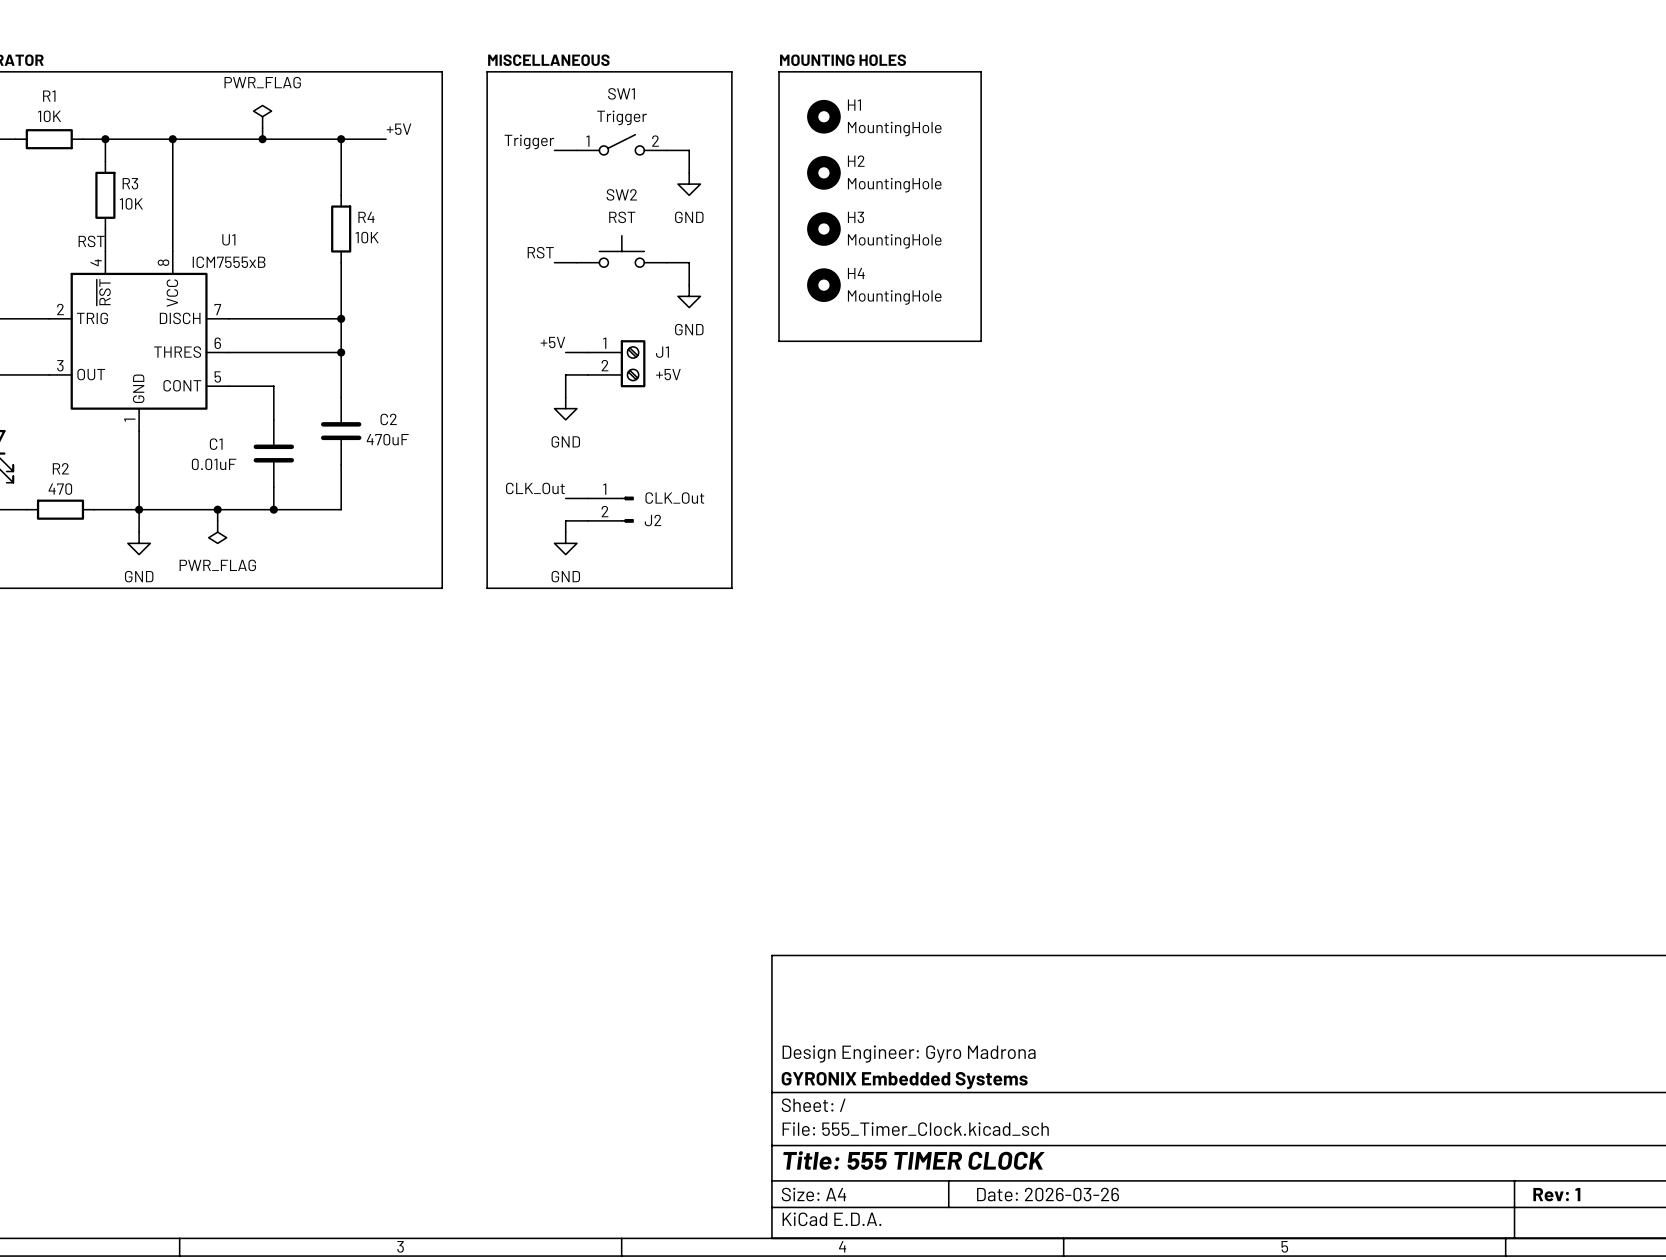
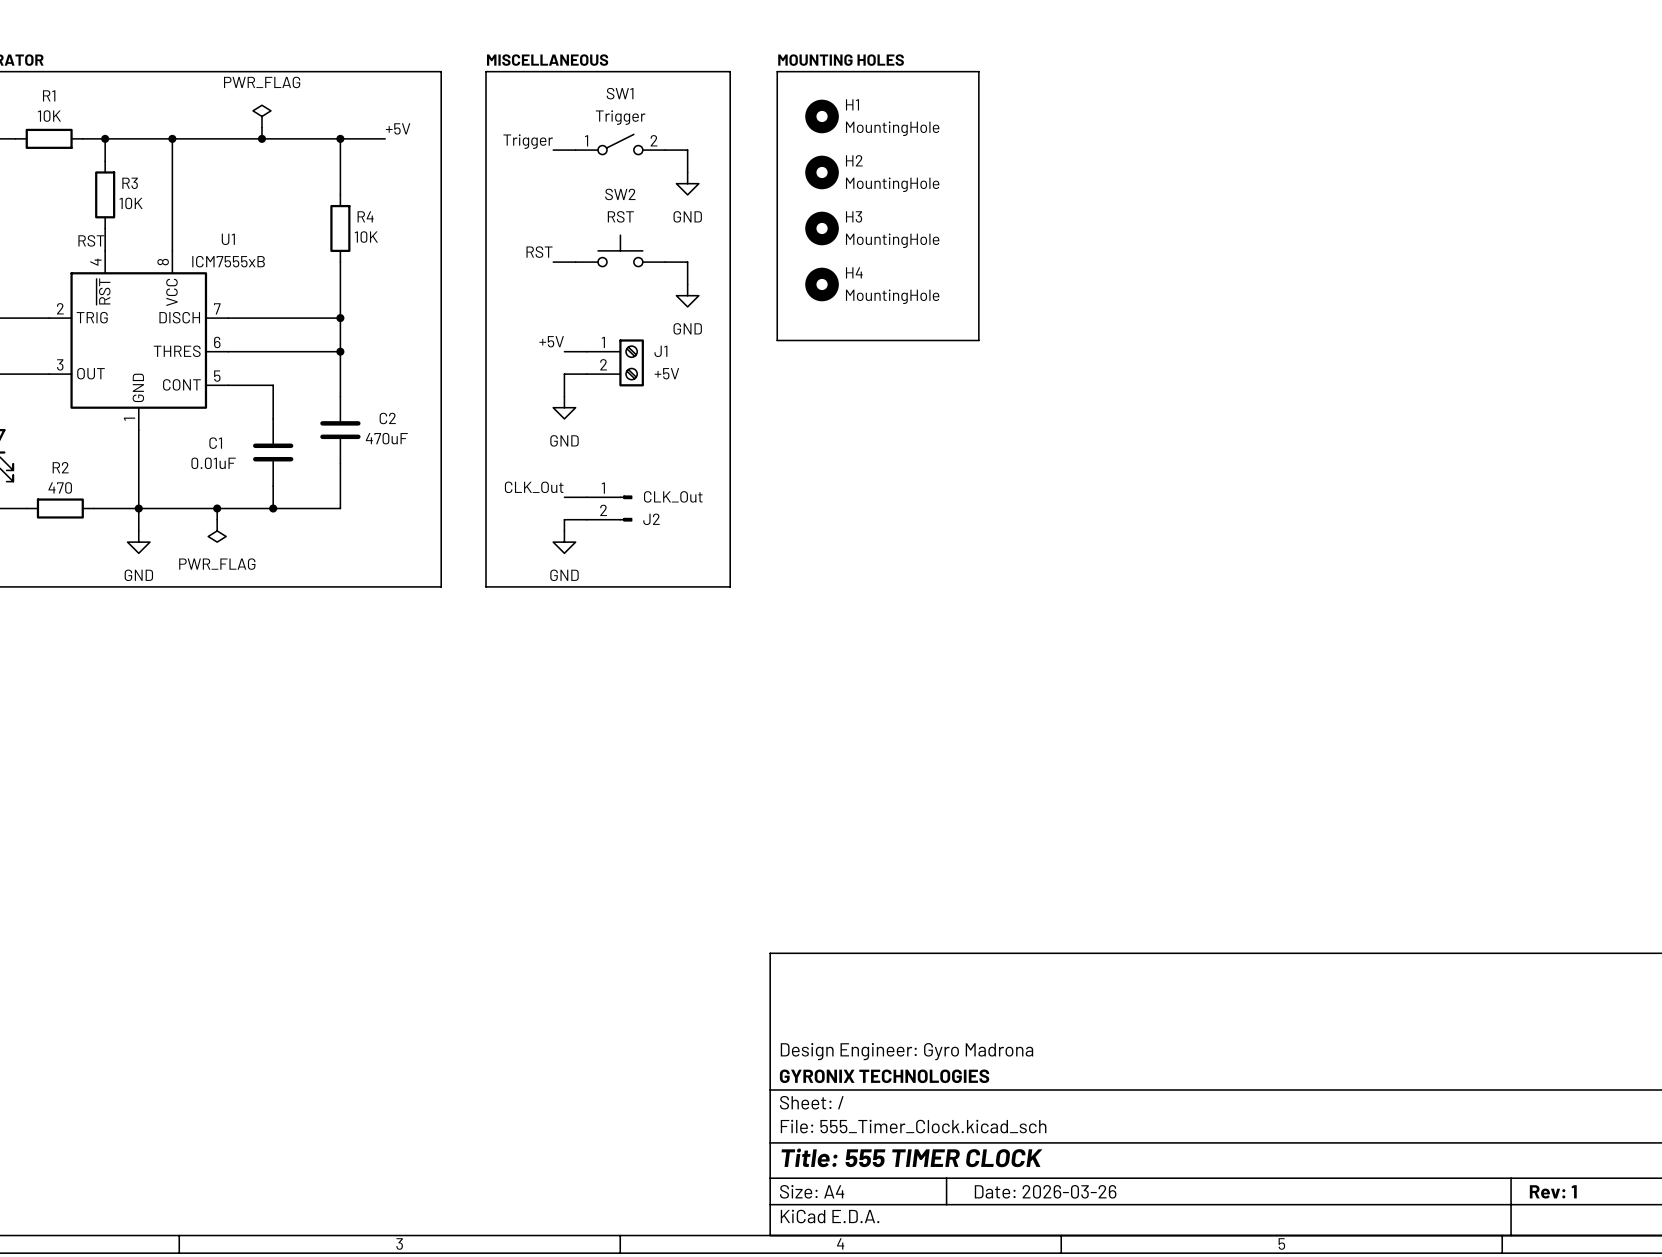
title block: GYRONIX Embedded Systems (904, 1080) -> GYRONIX TECHNOLOGIES (884, 1076)

